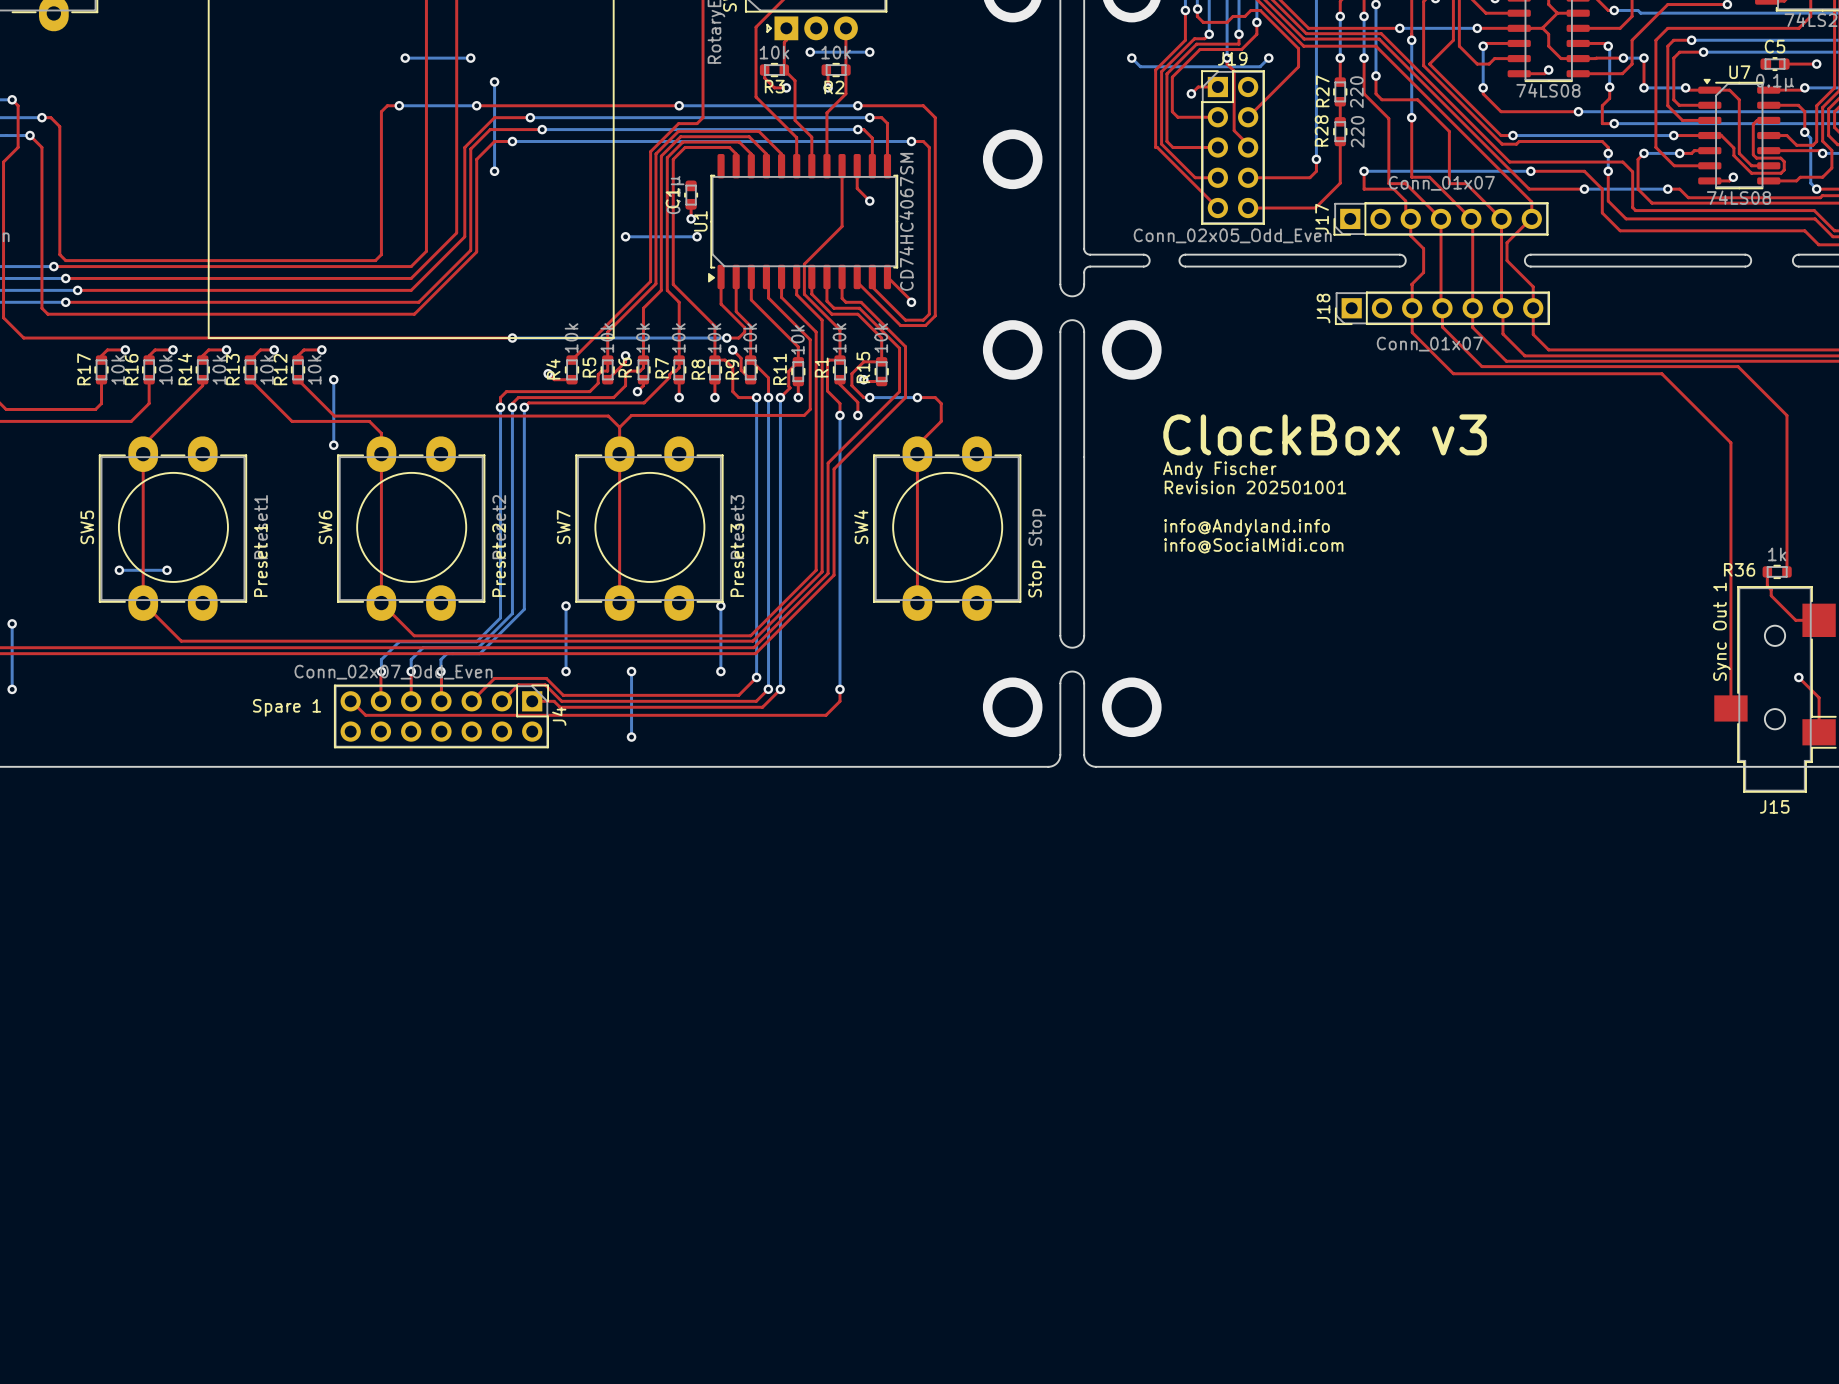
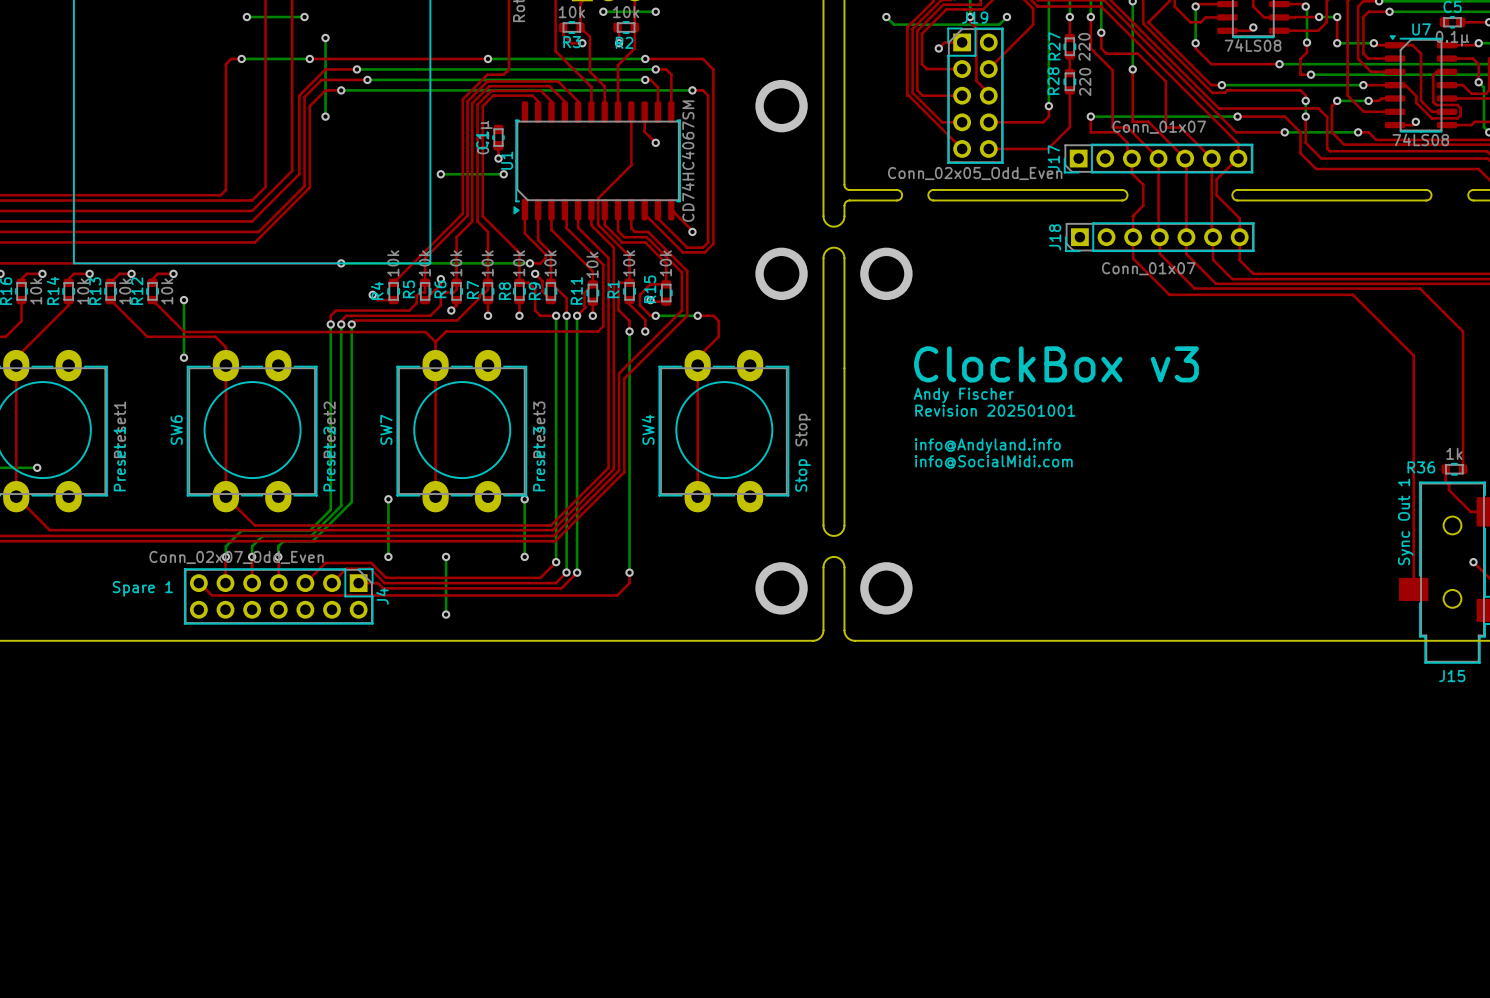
text: ClockBox v3 (1325, 434) -> none
text: Andy Fischer (1219, 470) -> ClockBox v3 (1056, 364)
text: Revision 202501001 (1255, 487) -> Andy Fischer (963, 395)
text: none -> Revision 202501001 (995, 410)
text: info@Andyland.info (1247, 527) -> none
text: info@SocialMidi.com (1253, 545) -> info@Andyland.info (987, 446)
text: none -> info@SocialMidi.com (993, 462)

